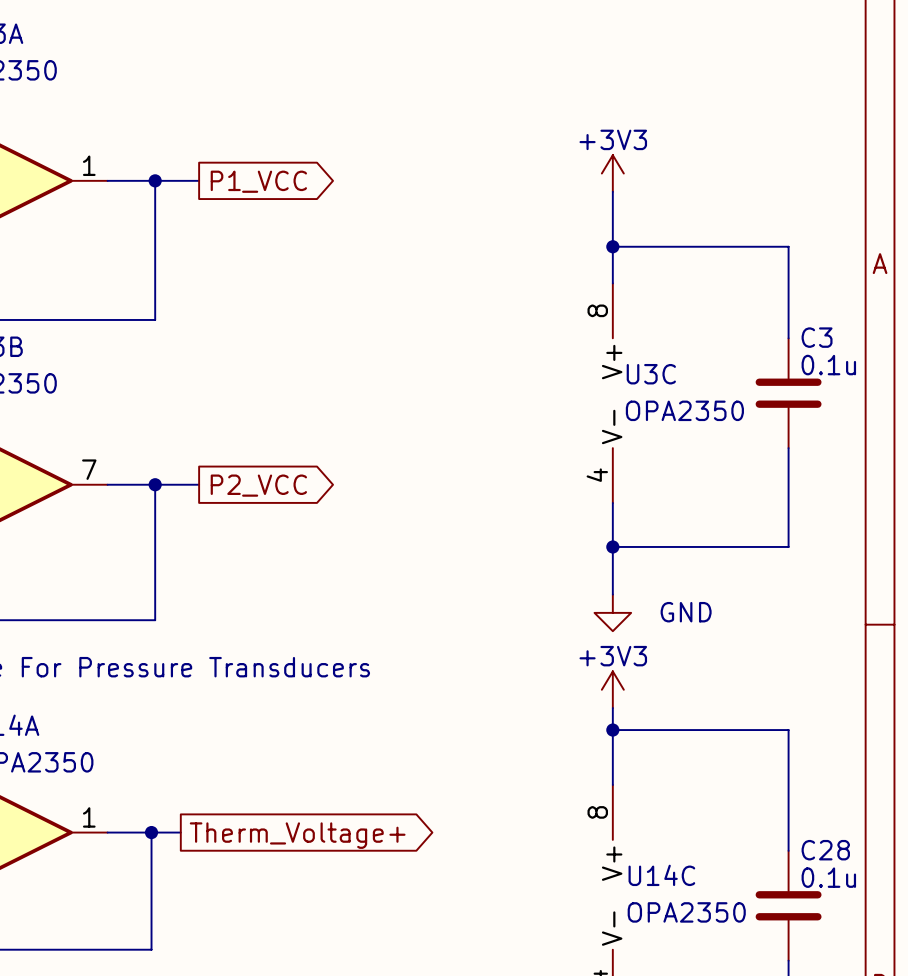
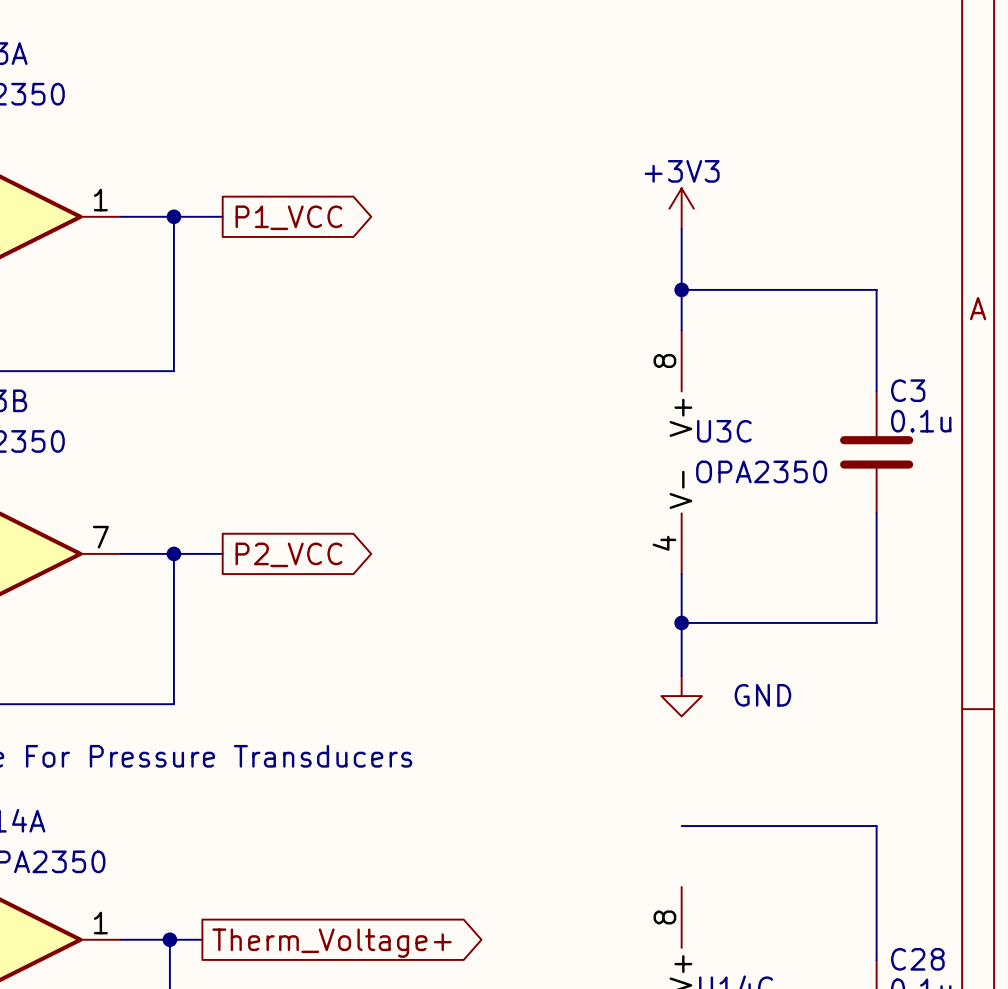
power symbol: +3V3 (612, 689) -> none
wire: (612, 708) (612, 784) -> none
junction: (612, 730) -> none

